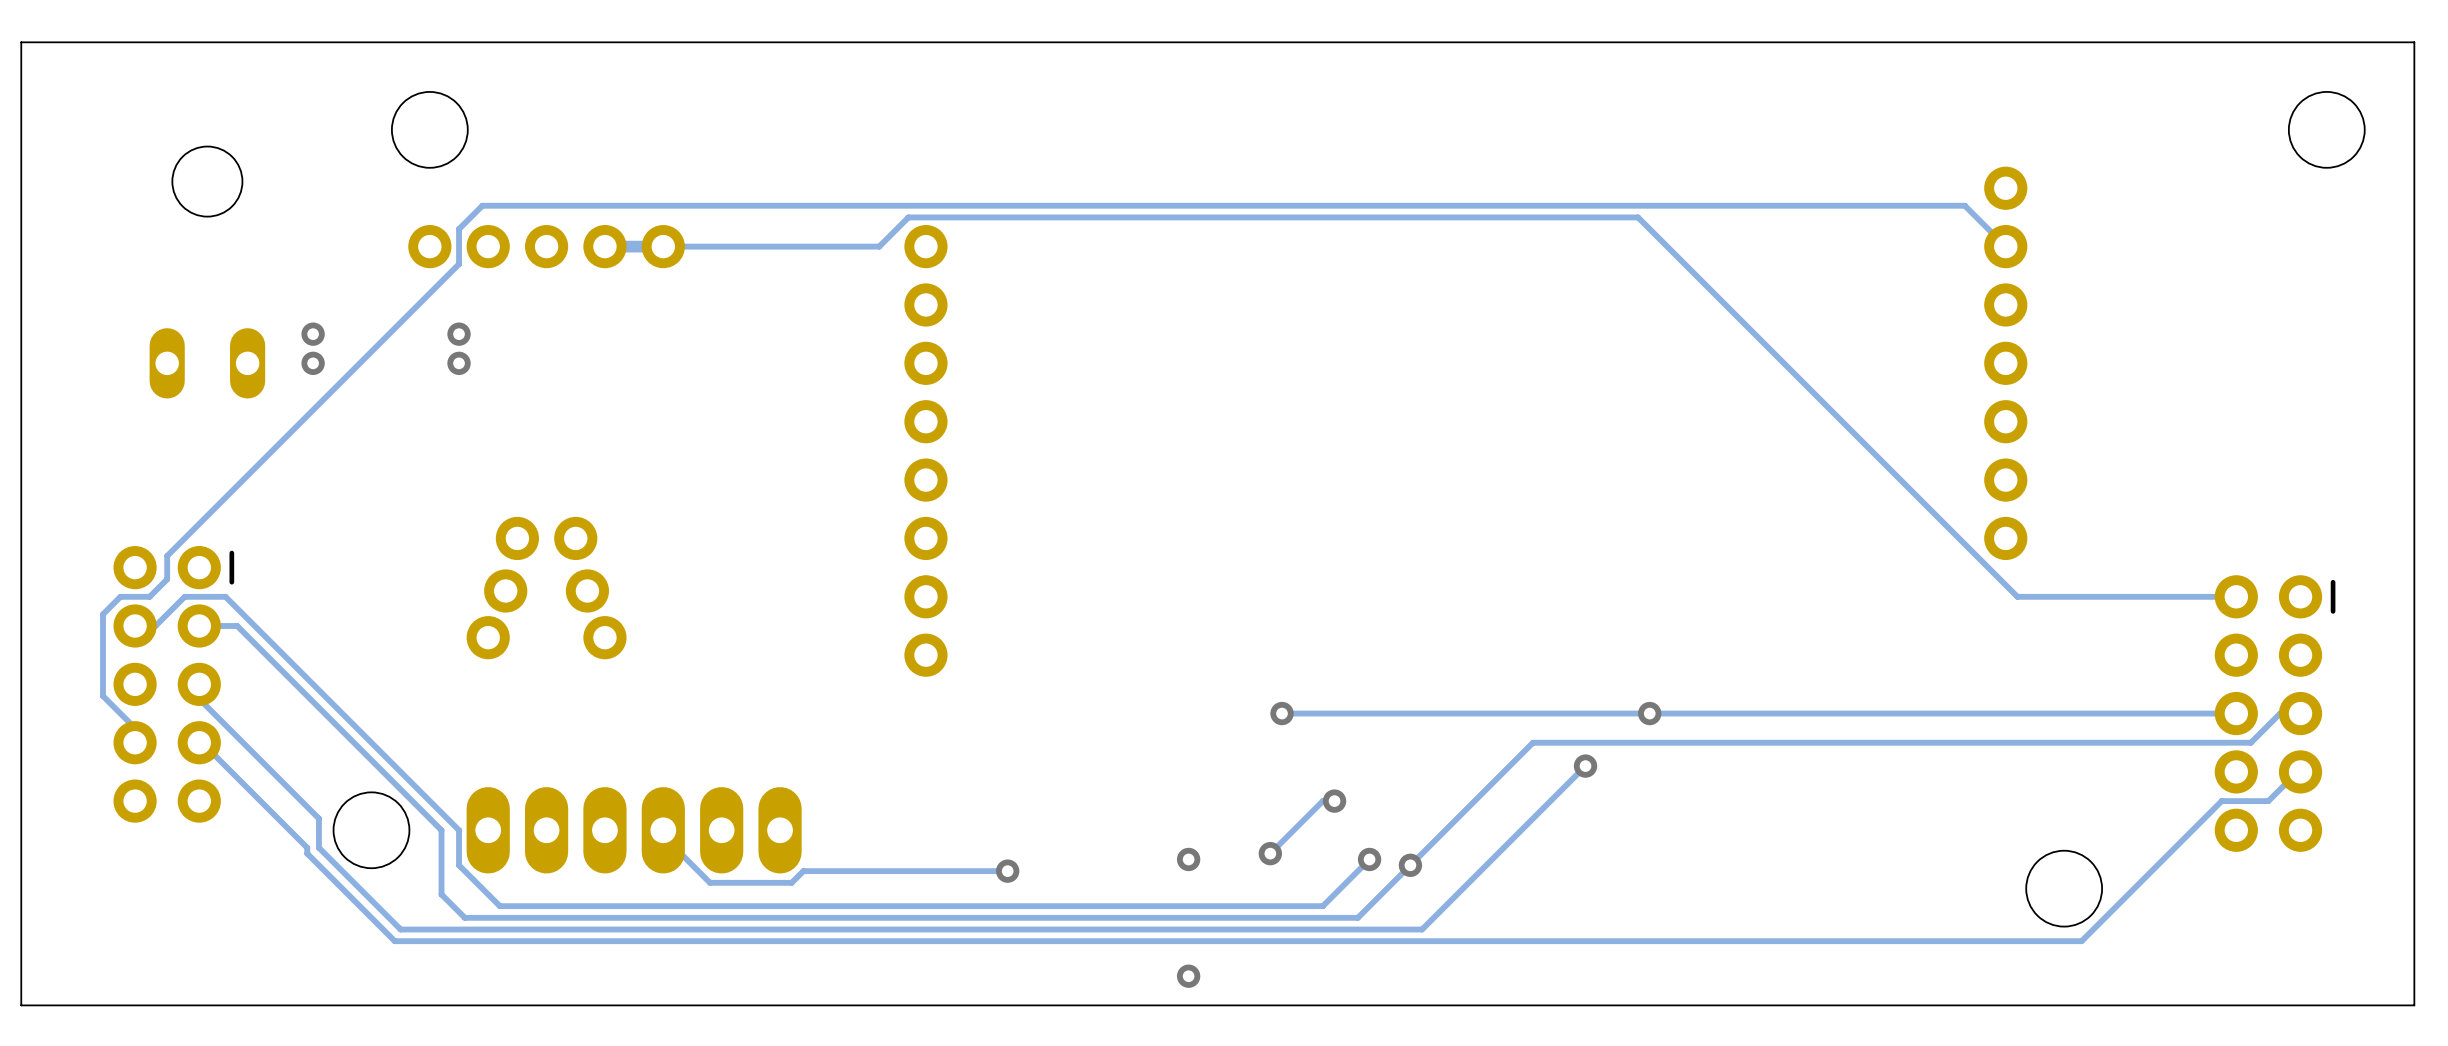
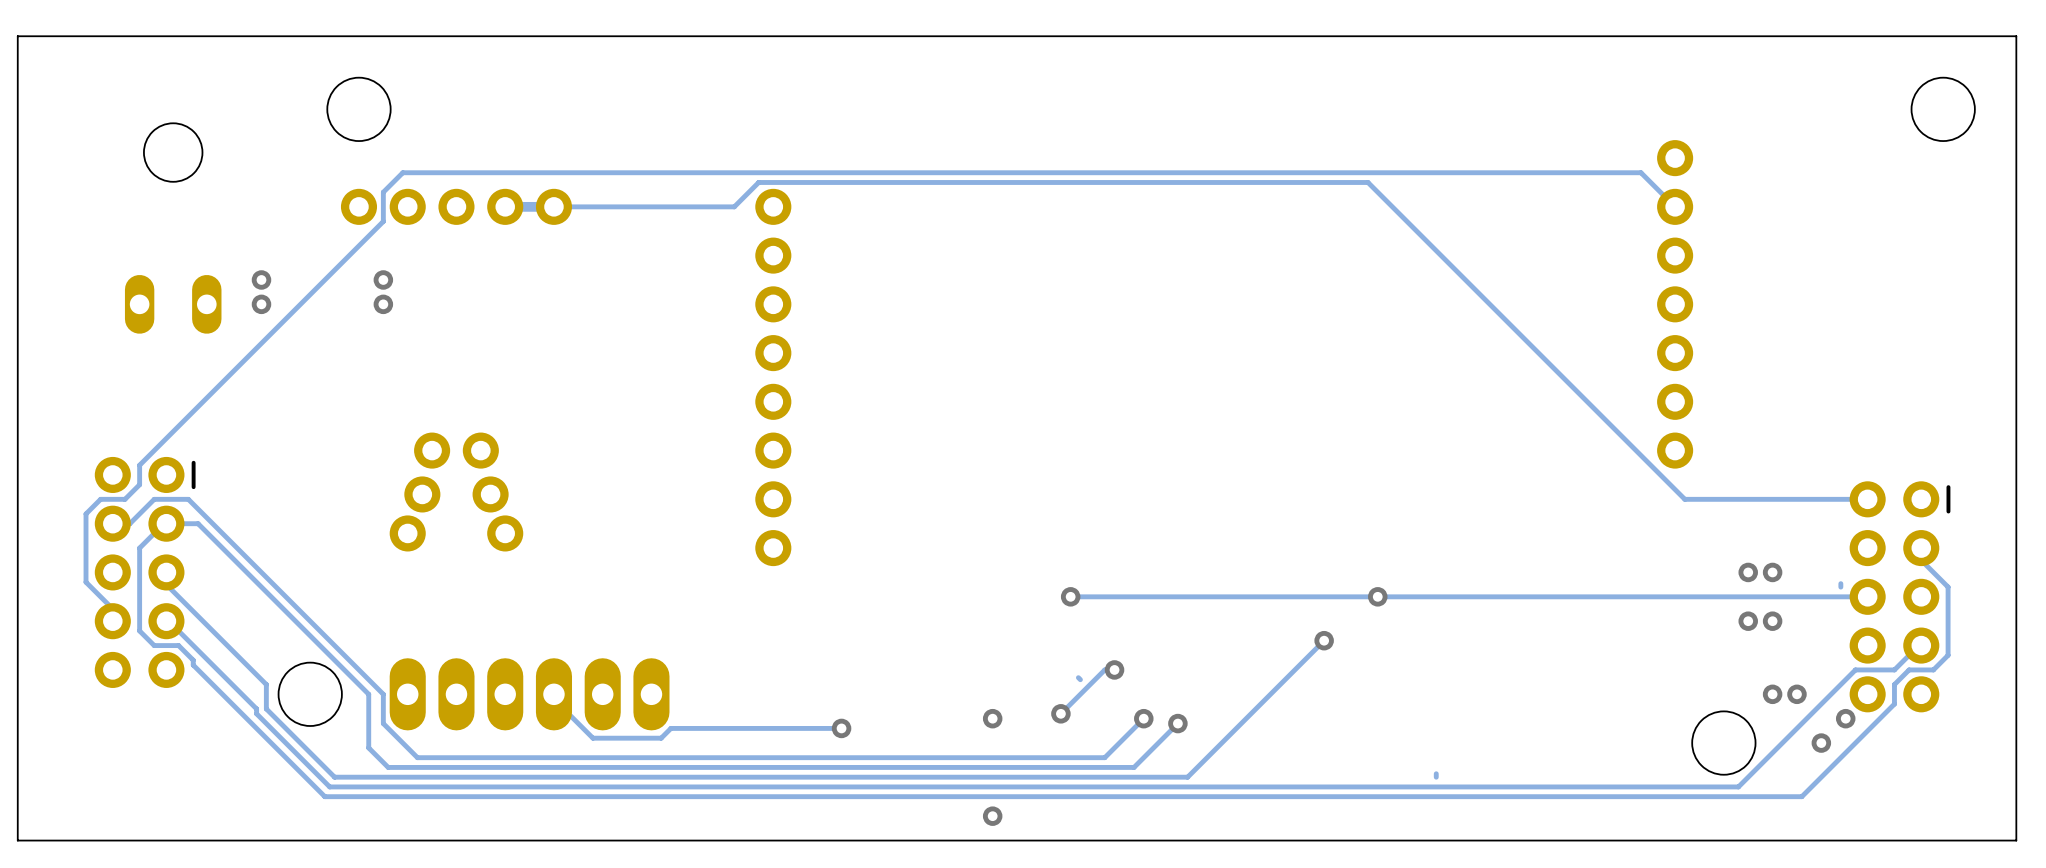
track: none -> (166, 523) (164, 523) (139, 548) (139, 630) (154, 645) (178, 645) (193, 660) (193, 665) (324, 796) (1801, 796) (1894, 704) (1894, 684) (1909, 669) (1933, 669) (1948, 655) (1948, 587) (1923, 562) (1923, 548) (1921, 548)
via: none -> (1748, 572)
via: none -> (1772, 572)
track: none -> (1840, 583) (1840, 587)
track: (2300, 713) (2280, 713) (2250, 742) (1532, 742) (1410, 865) -> none
via: none -> (1748, 621)
via: none -> (1772, 621)
track: none -> (1078, 677) (1080, 679)
via: none -> (1772, 694)
via: none -> (1796, 694)
via: none -> (1845, 718)
via: none -> (1821, 743)
track: none -> (1436, 773) (1436, 777)

